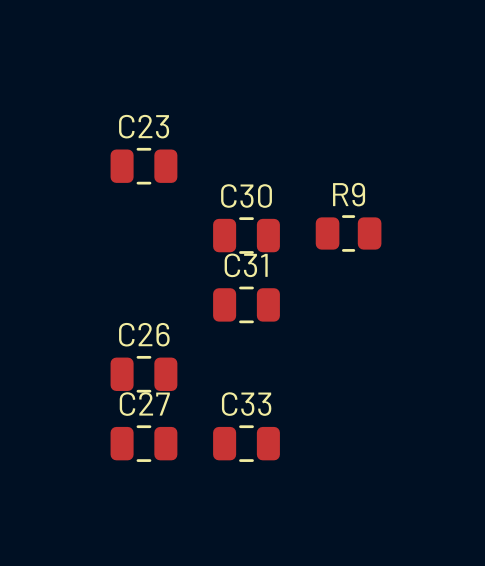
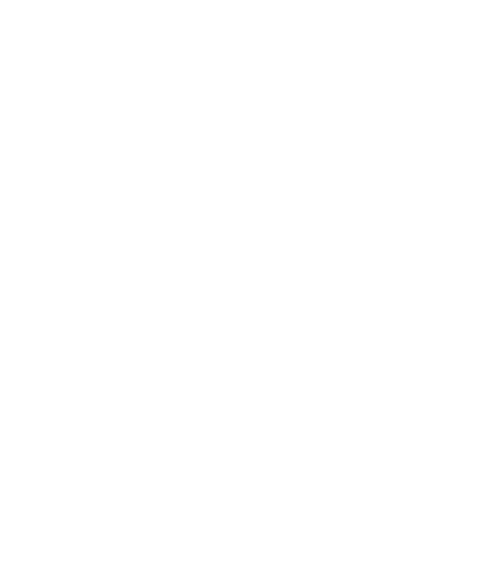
C23: (143, 166) -> none
R9: (348, 233) -> none
C30: (246, 235) -> none
C31: (246, 304) -> none
C26: (143, 374) -> none
C27: (143, 443) -> none
C33: (246, 443) -> none

